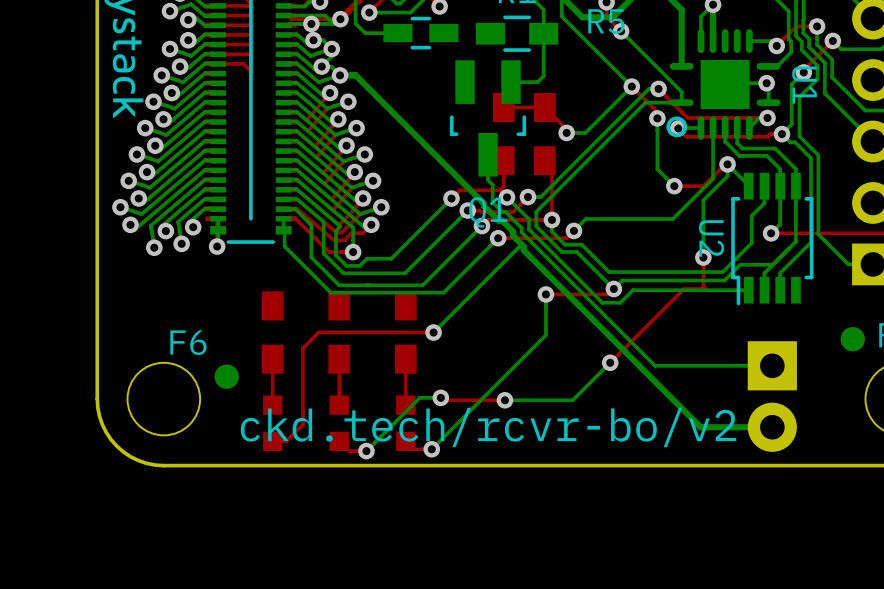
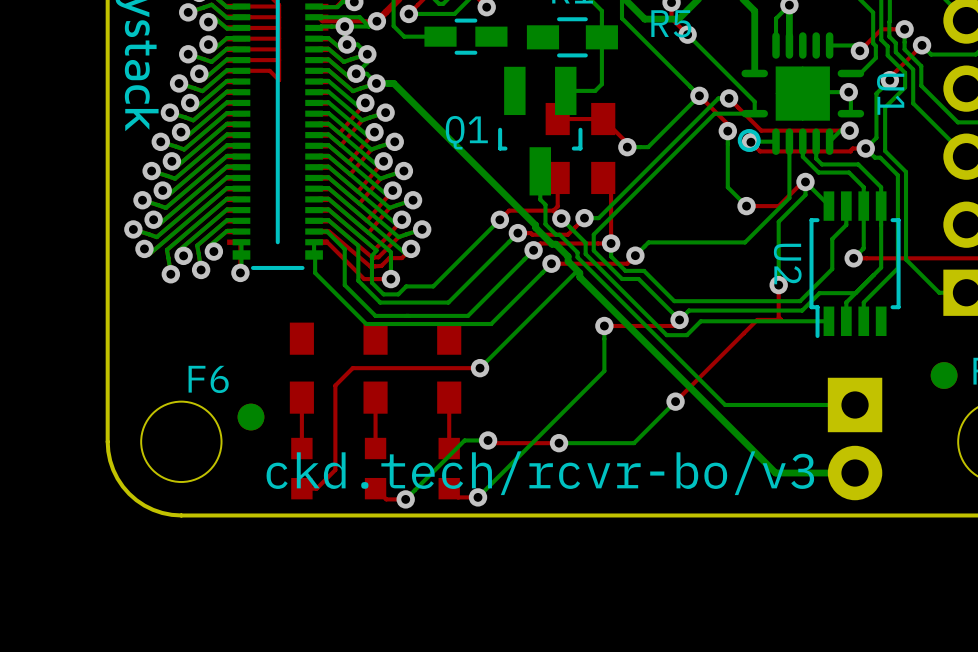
Q1 name position: Q1 (488, 212) -> Q1 (466, 132)
text: ckd.tech/rcvr-bo/v2 (488, 427) -> ckd.tech/rcvr-bo/v3 (540, 473)

